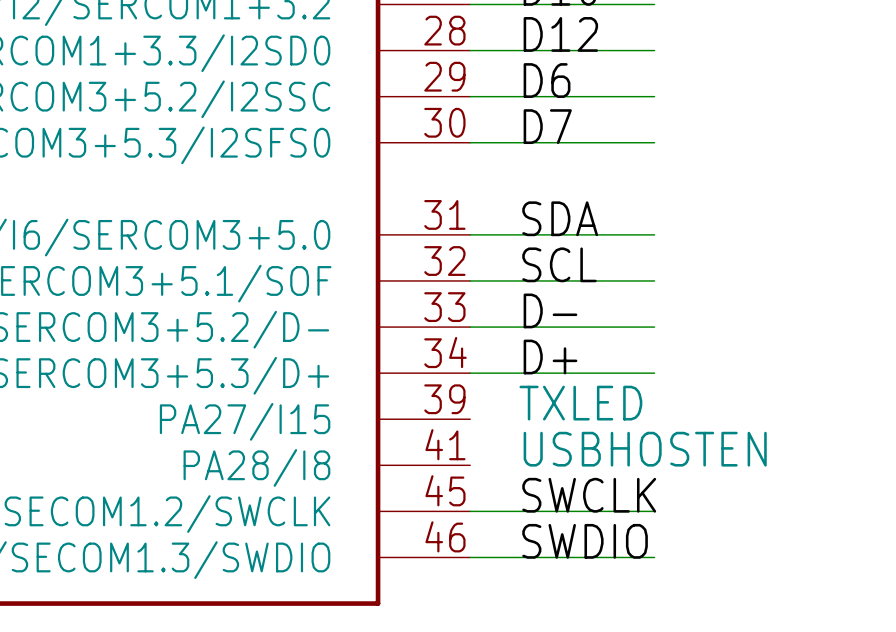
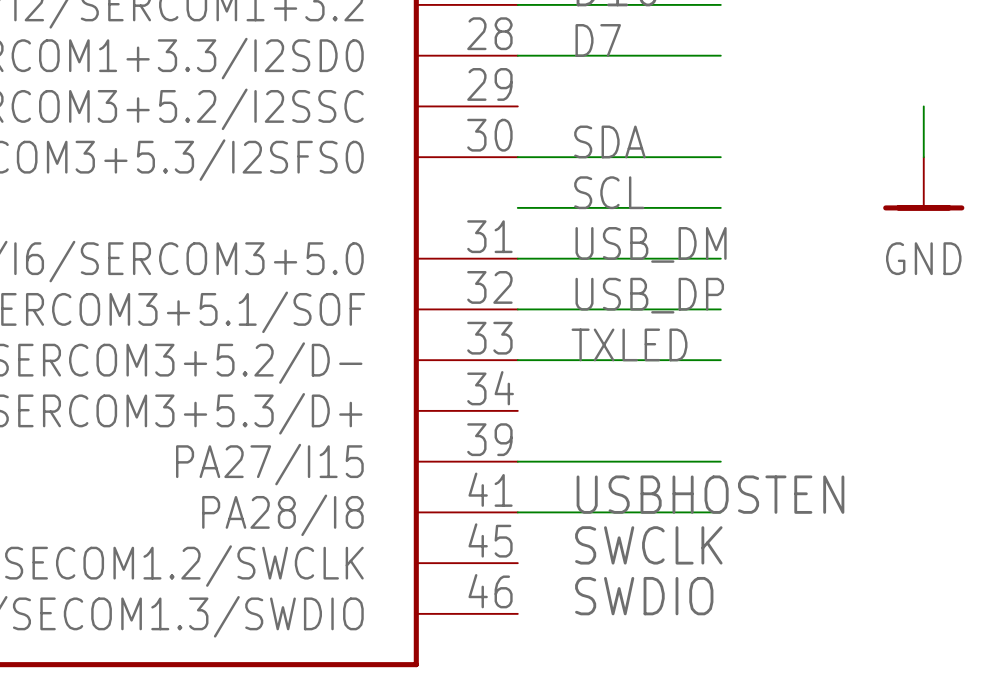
label: D12 (560, 34) -> D7 (598, 40)
label: D6 (547, 80) -> none
wire: (470, 96) (654, 96) -> (517, 207) (720, 207)
wire: none -> (923, 106) (923, 157)
label: D7 (547, 126) -> SDA (609, 141)
power symbol: none -> GND (923, 183)
label: none -> SCL (609, 192)
label: SDA (560, 218) -> USB_DM (651, 244)
label: SCL (559, 264) -> USB_DP (649, 295)
label: D- (550, 310) -> TXLED (629, 344)
label: D+ (550, 357) -> none
wire: (470, 373) (654, 373) -> (517, 512) (720, 512)
text: TXLED (580, 403) -> none
wire: (470, 511) (654, 511) -> (517, 461) (720, 461)
wire: (470, 557) (654, 557) -> none

